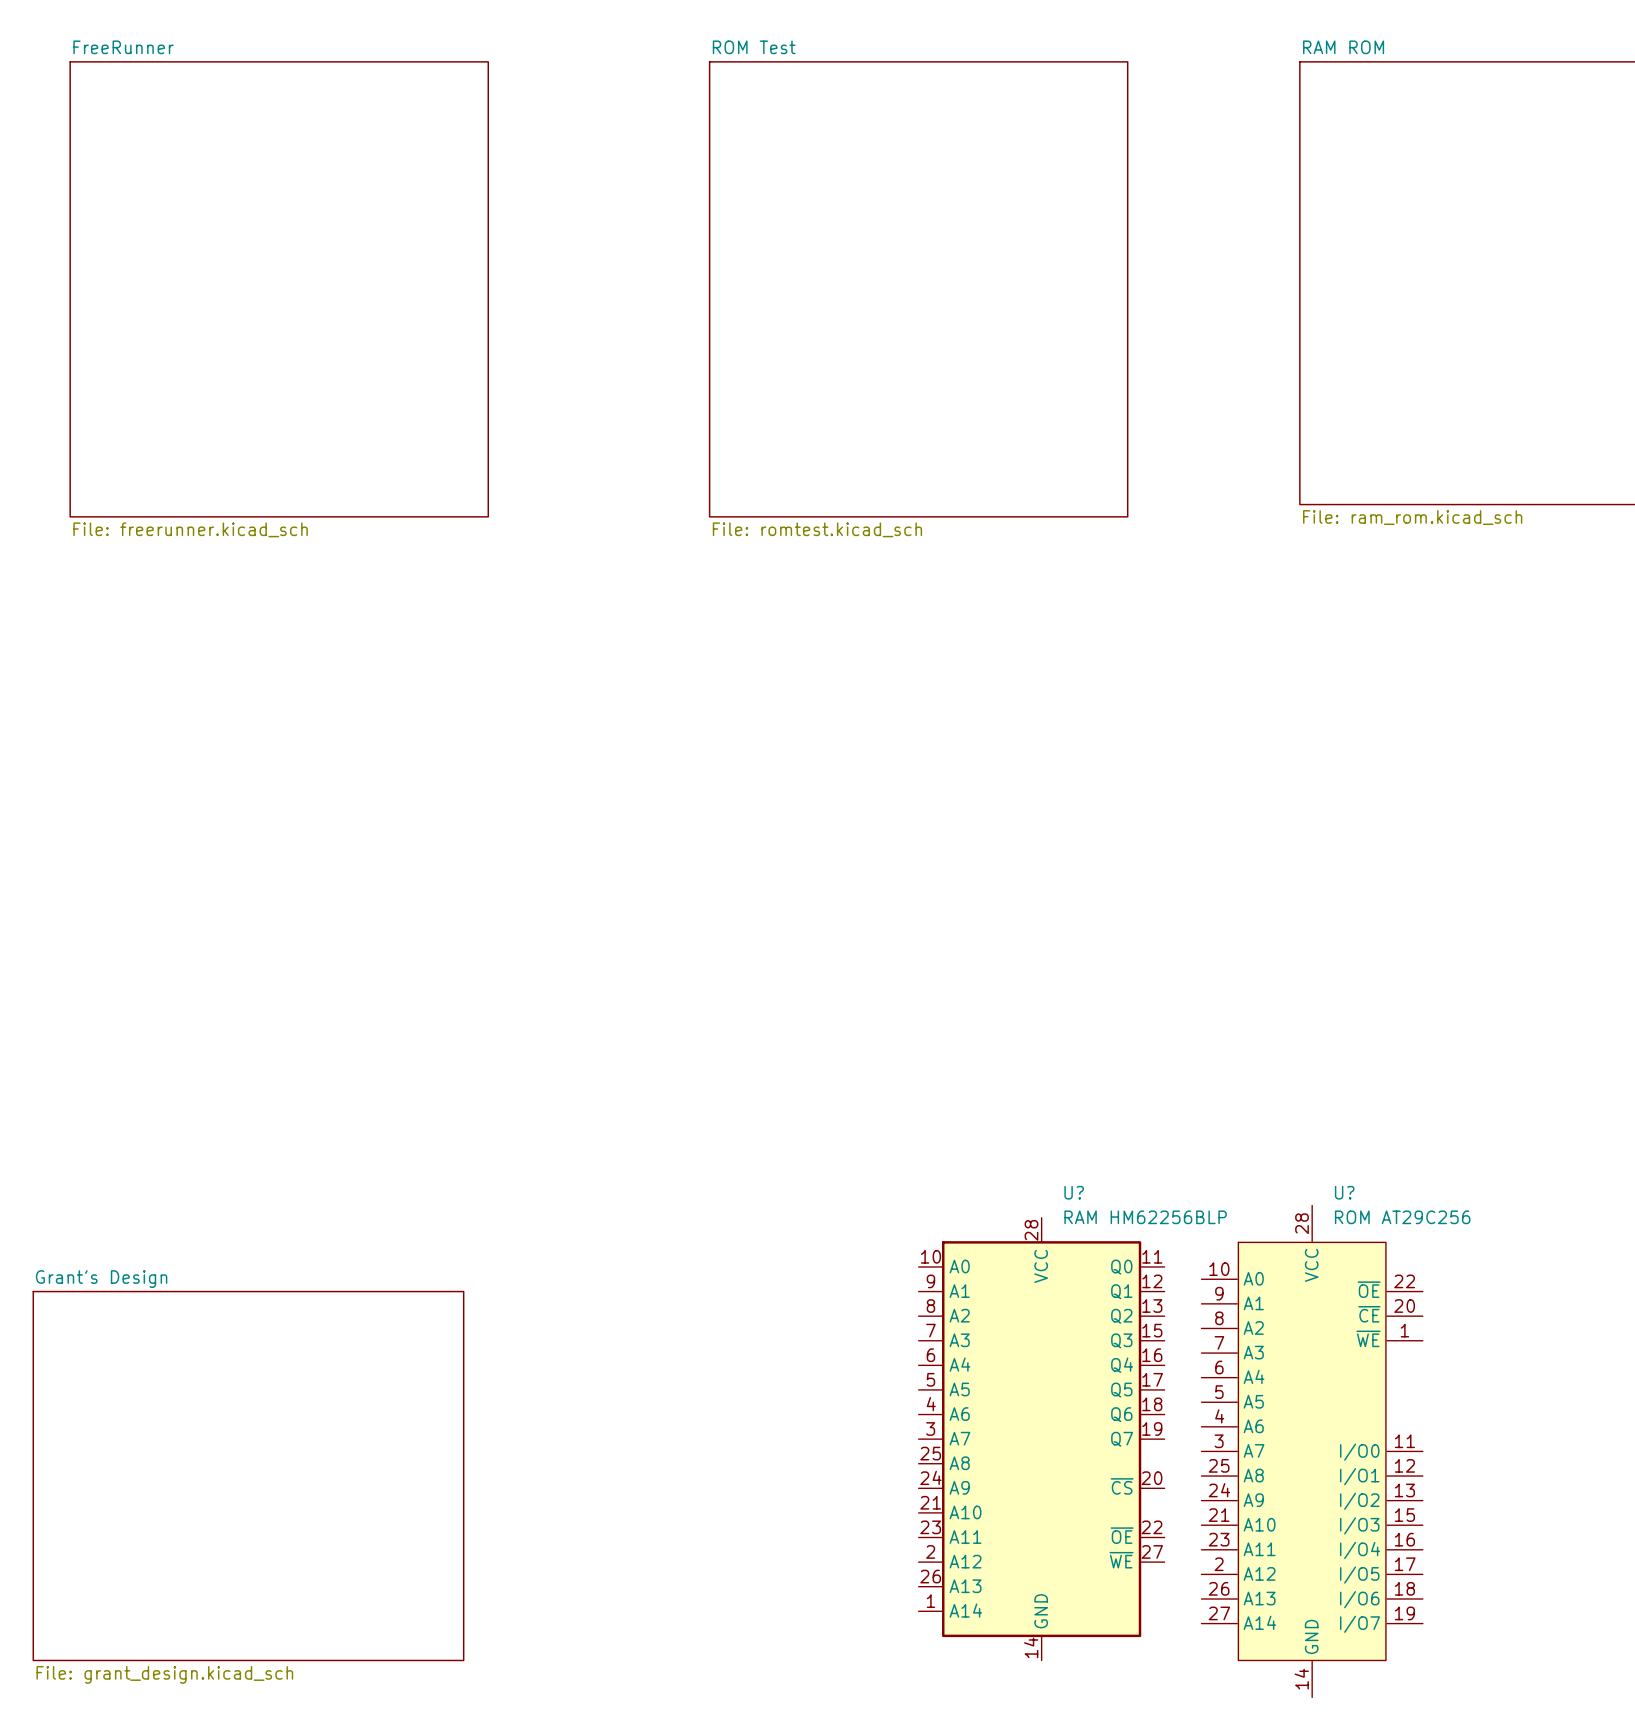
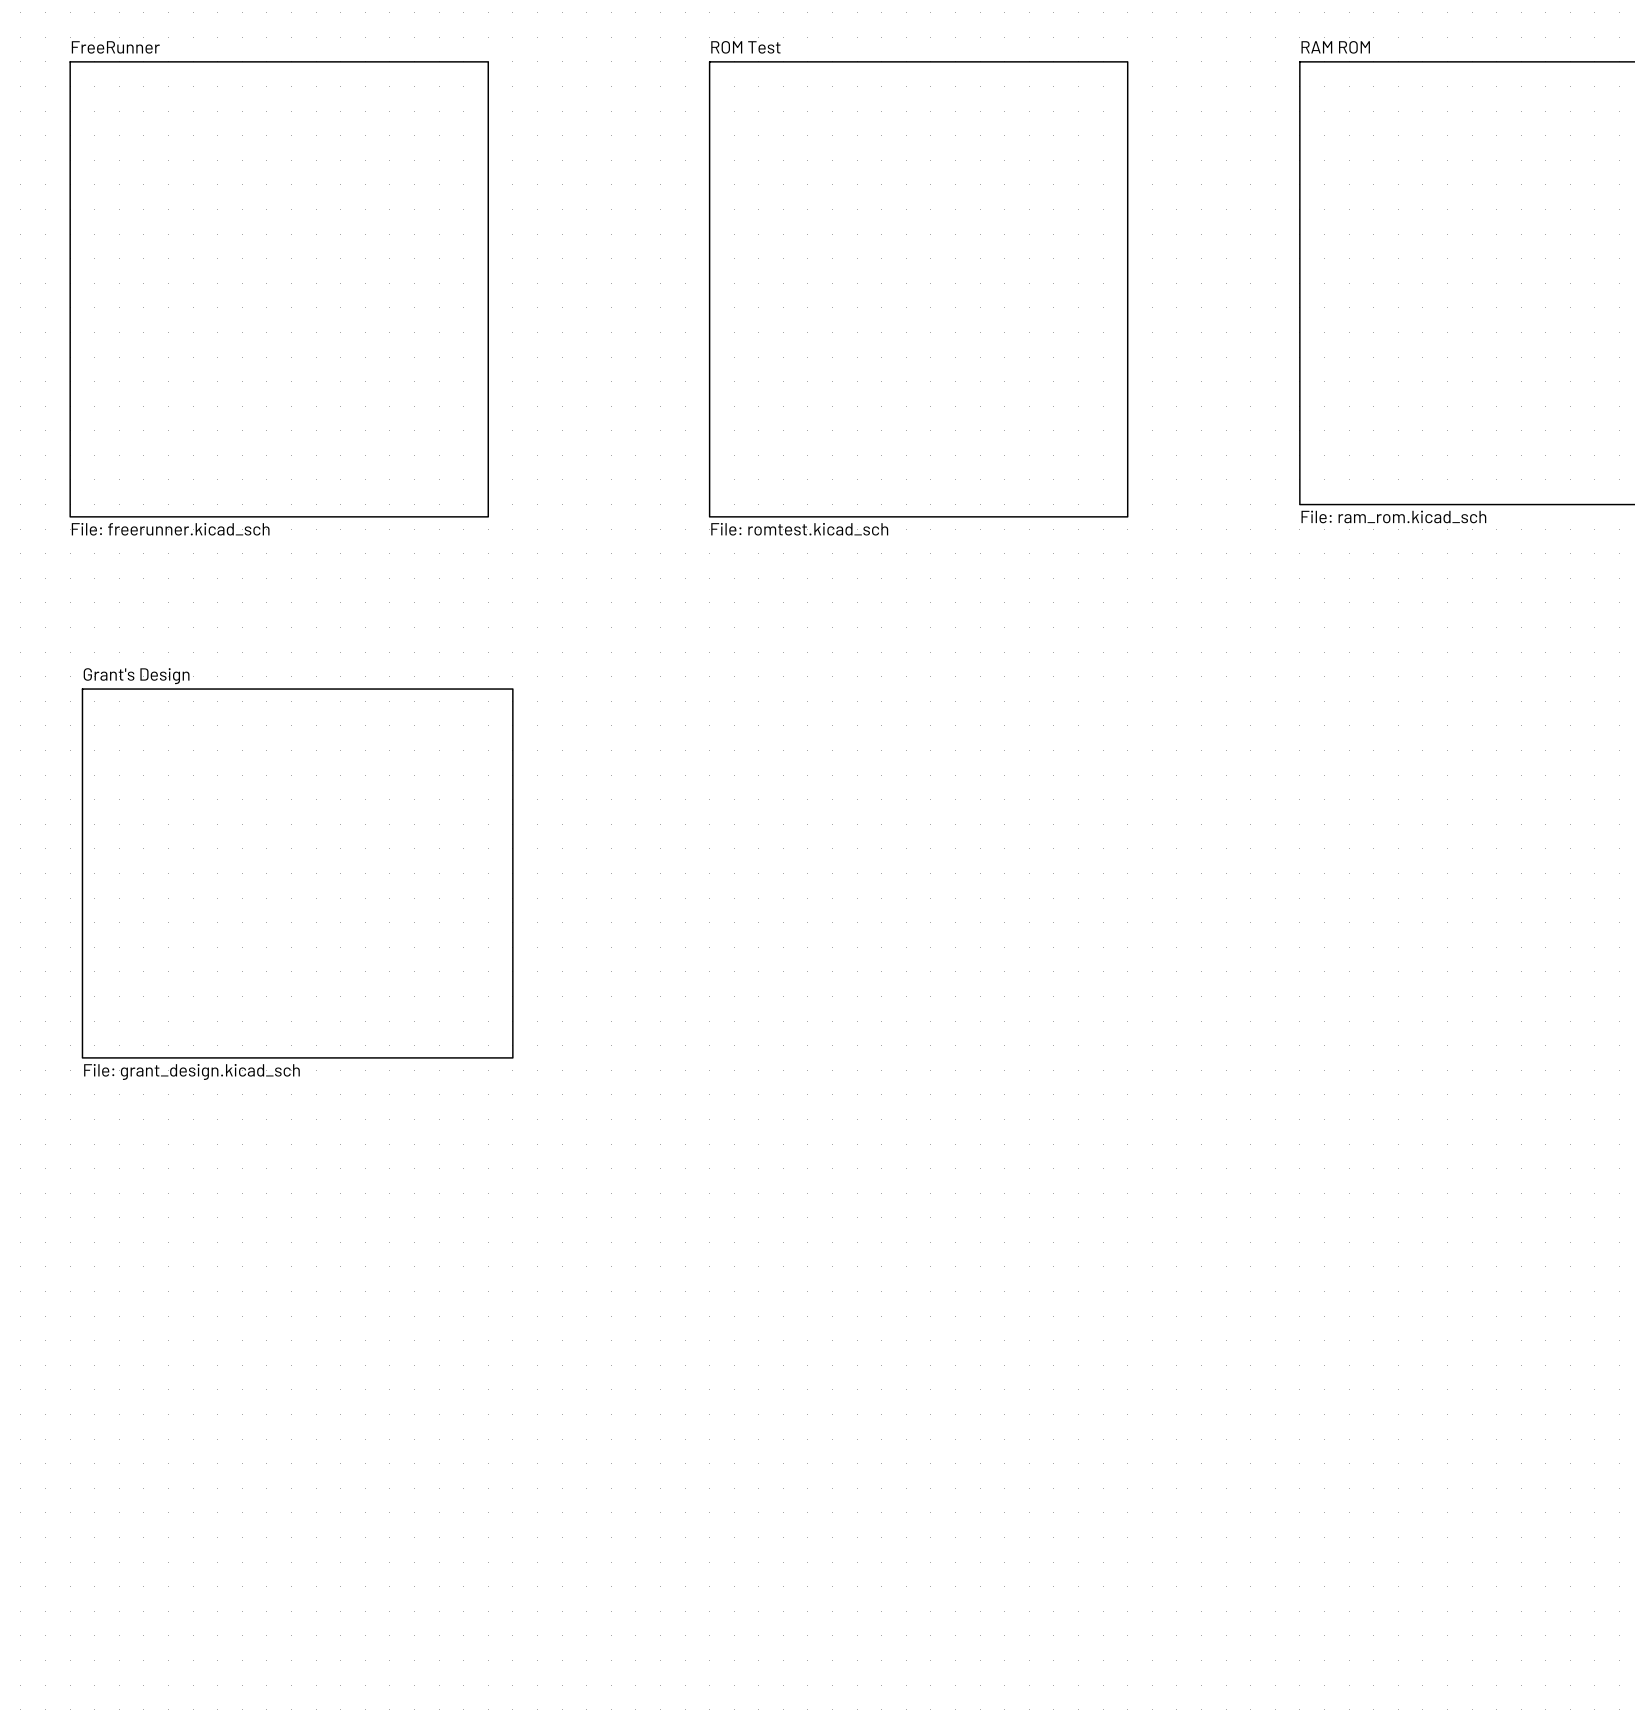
sheet Grant's Design: none -> File: grant_design.kicad_sch (297, 873)
U?: RAM HM62256BLP (1041, 1439) -> none
U?: ROM AT29C256 (1312, 1451) -> none
sheet Grant's Design: File: grant_design.kicad_sch (248, 1476) -> none

